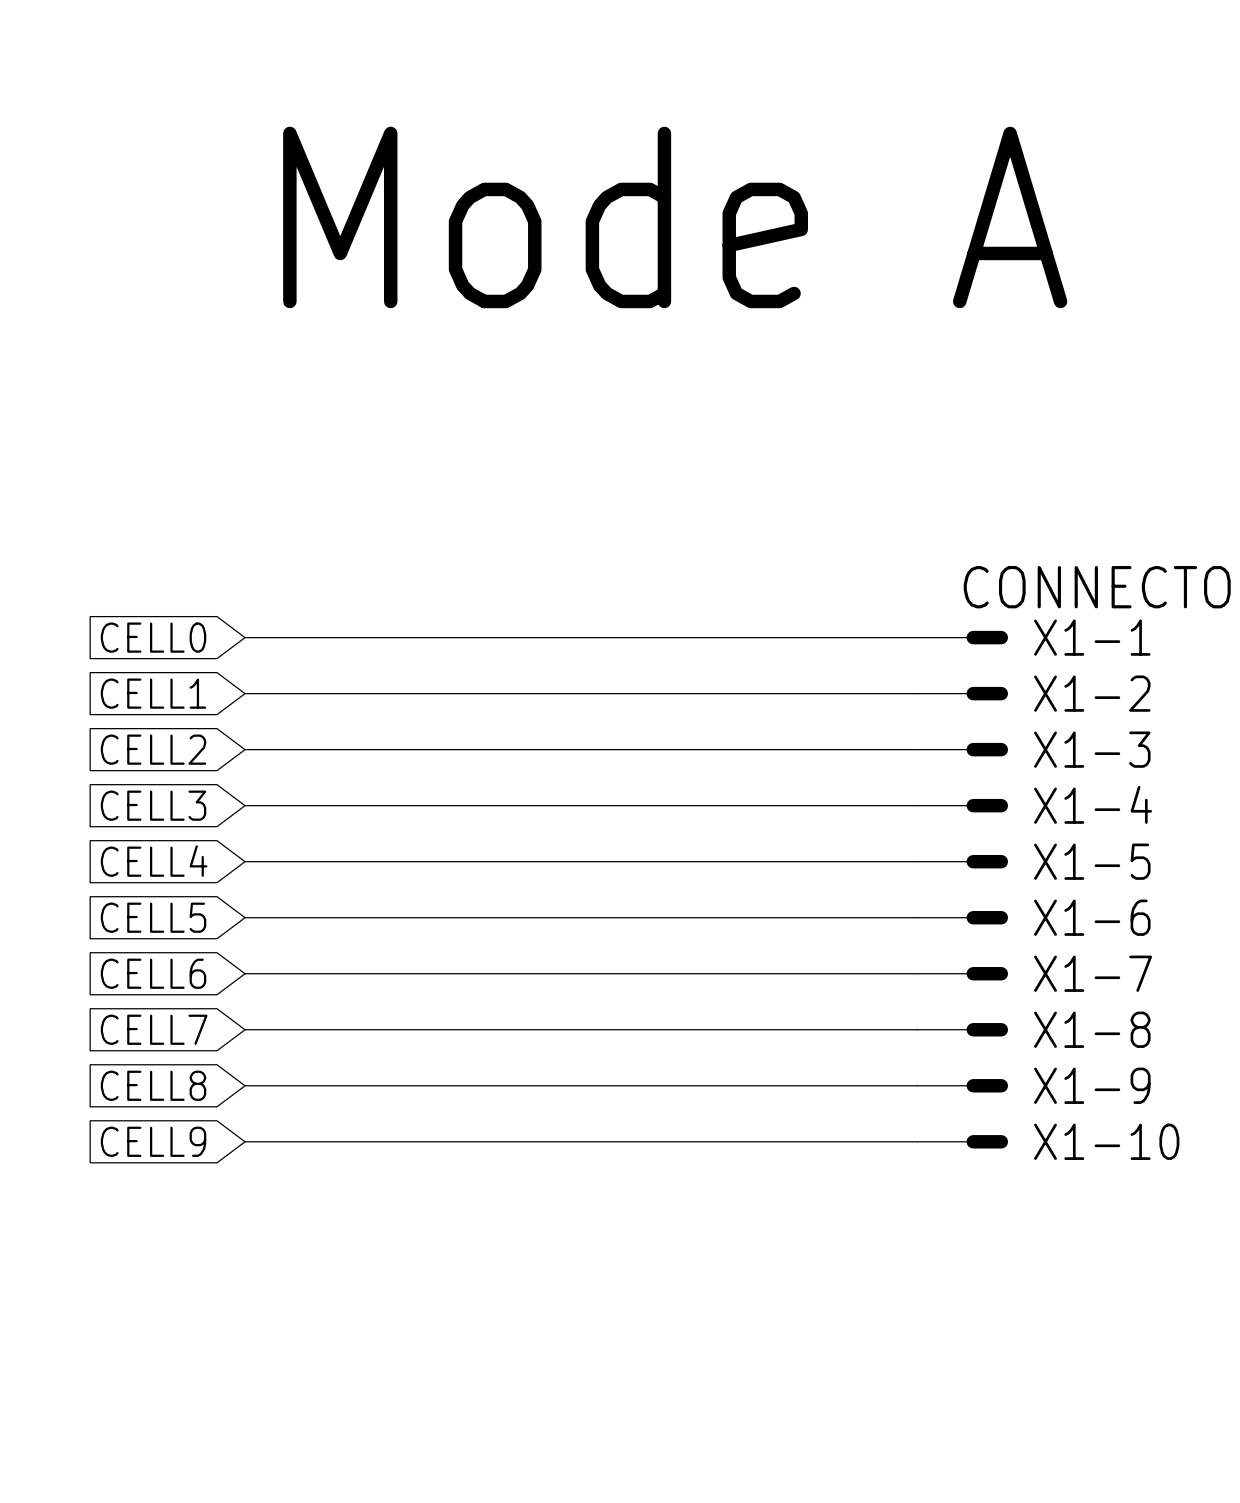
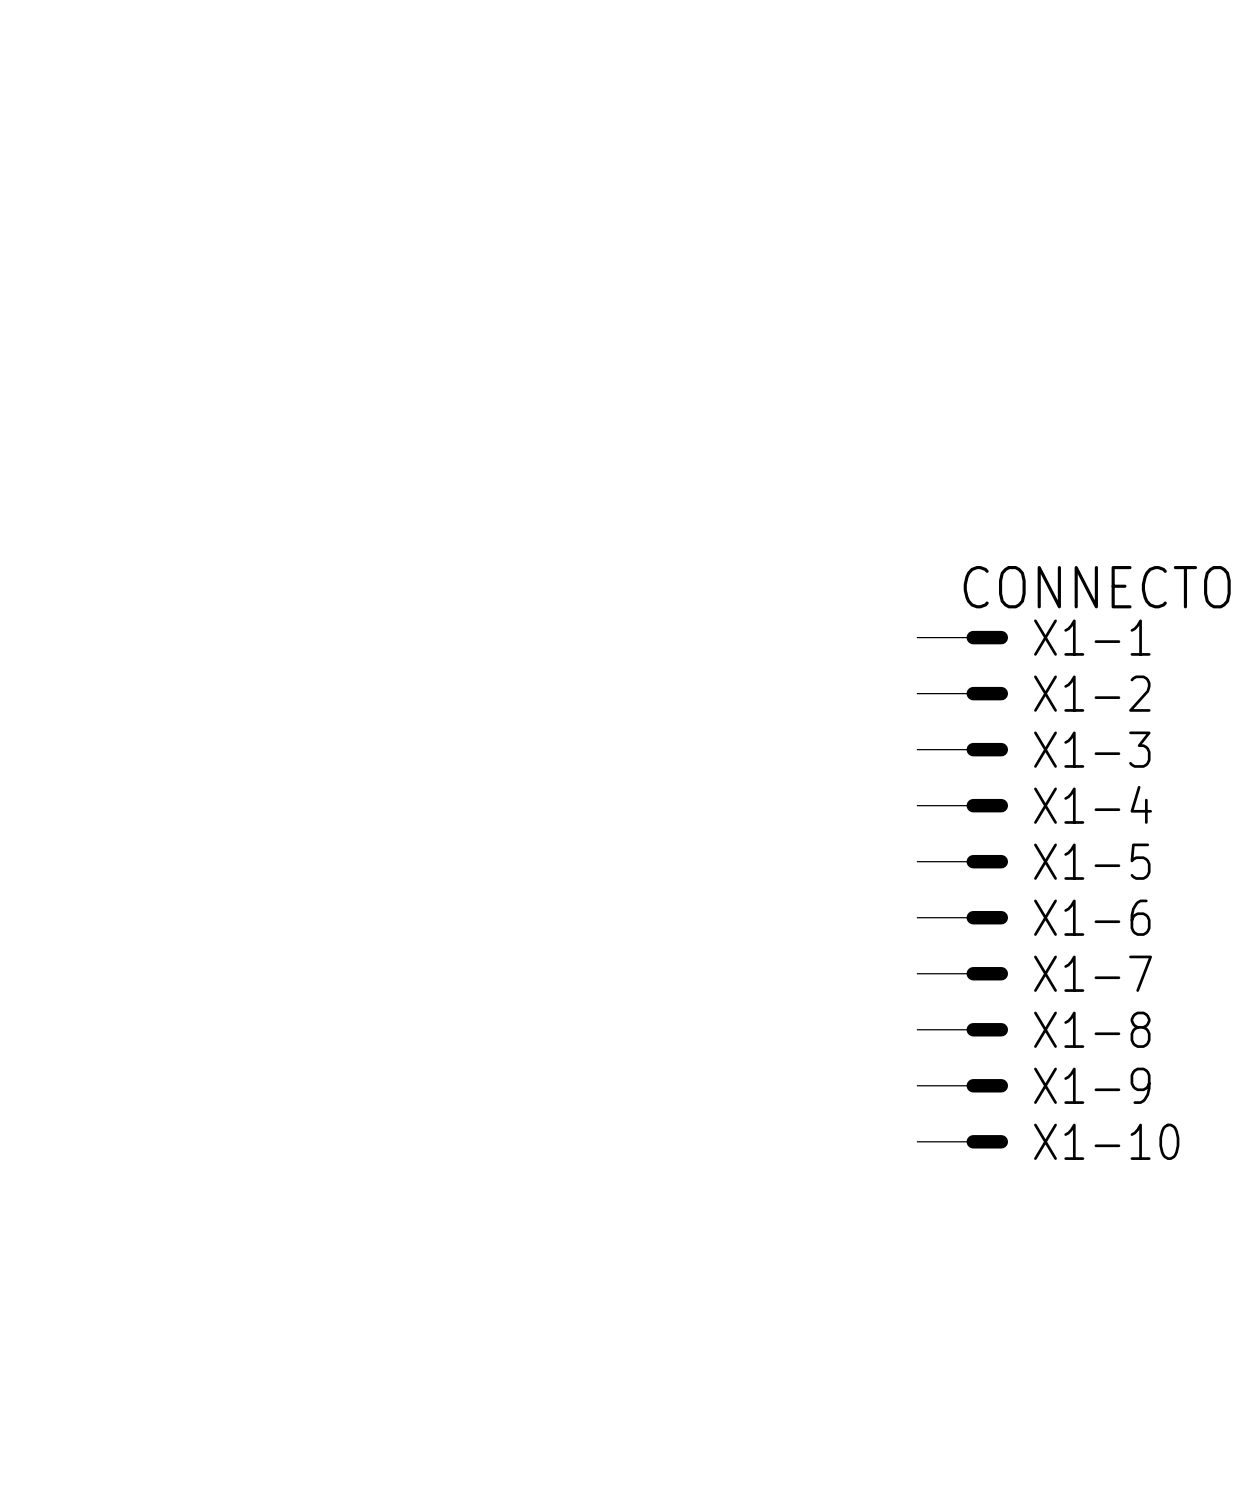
text: Mode A (675, 217) -> none
global label: CELL0 (153, 637) -> none
wire: (245, 637) (917, 637) -> none
global label: CELL1 (153, 693) -> none
wire: (245, 693) (917, 693) -> none
global label: CELL2 (153, 749) -> none
wire: (245, 749) (917, 749) -> none
global label: CELL3 (153, 805) -> none
wire: (245, 805) (917, 805) -> none
global label: CELL4 (154, 861) -> none
wire: (245, 861) (917, 861) -> none
global label: CELL5 (153, 917) -> none
wire: (245, 917) (917, 917) -> none
global label: CELL6 (153, 973) -> none
wire: (245, 973) (917, 973) -> none
global label: CELL7 (154, 1029) -> none
wire: (245, 1029) (917, 1029) -> none
global label: CELL8 (153, 1085) -> none
wire: (245, 1085) (917, 1085) -> none
global label: CELL9 (153, 1141) -> none
wire: (245, 1141) (917, 1141) -> none

